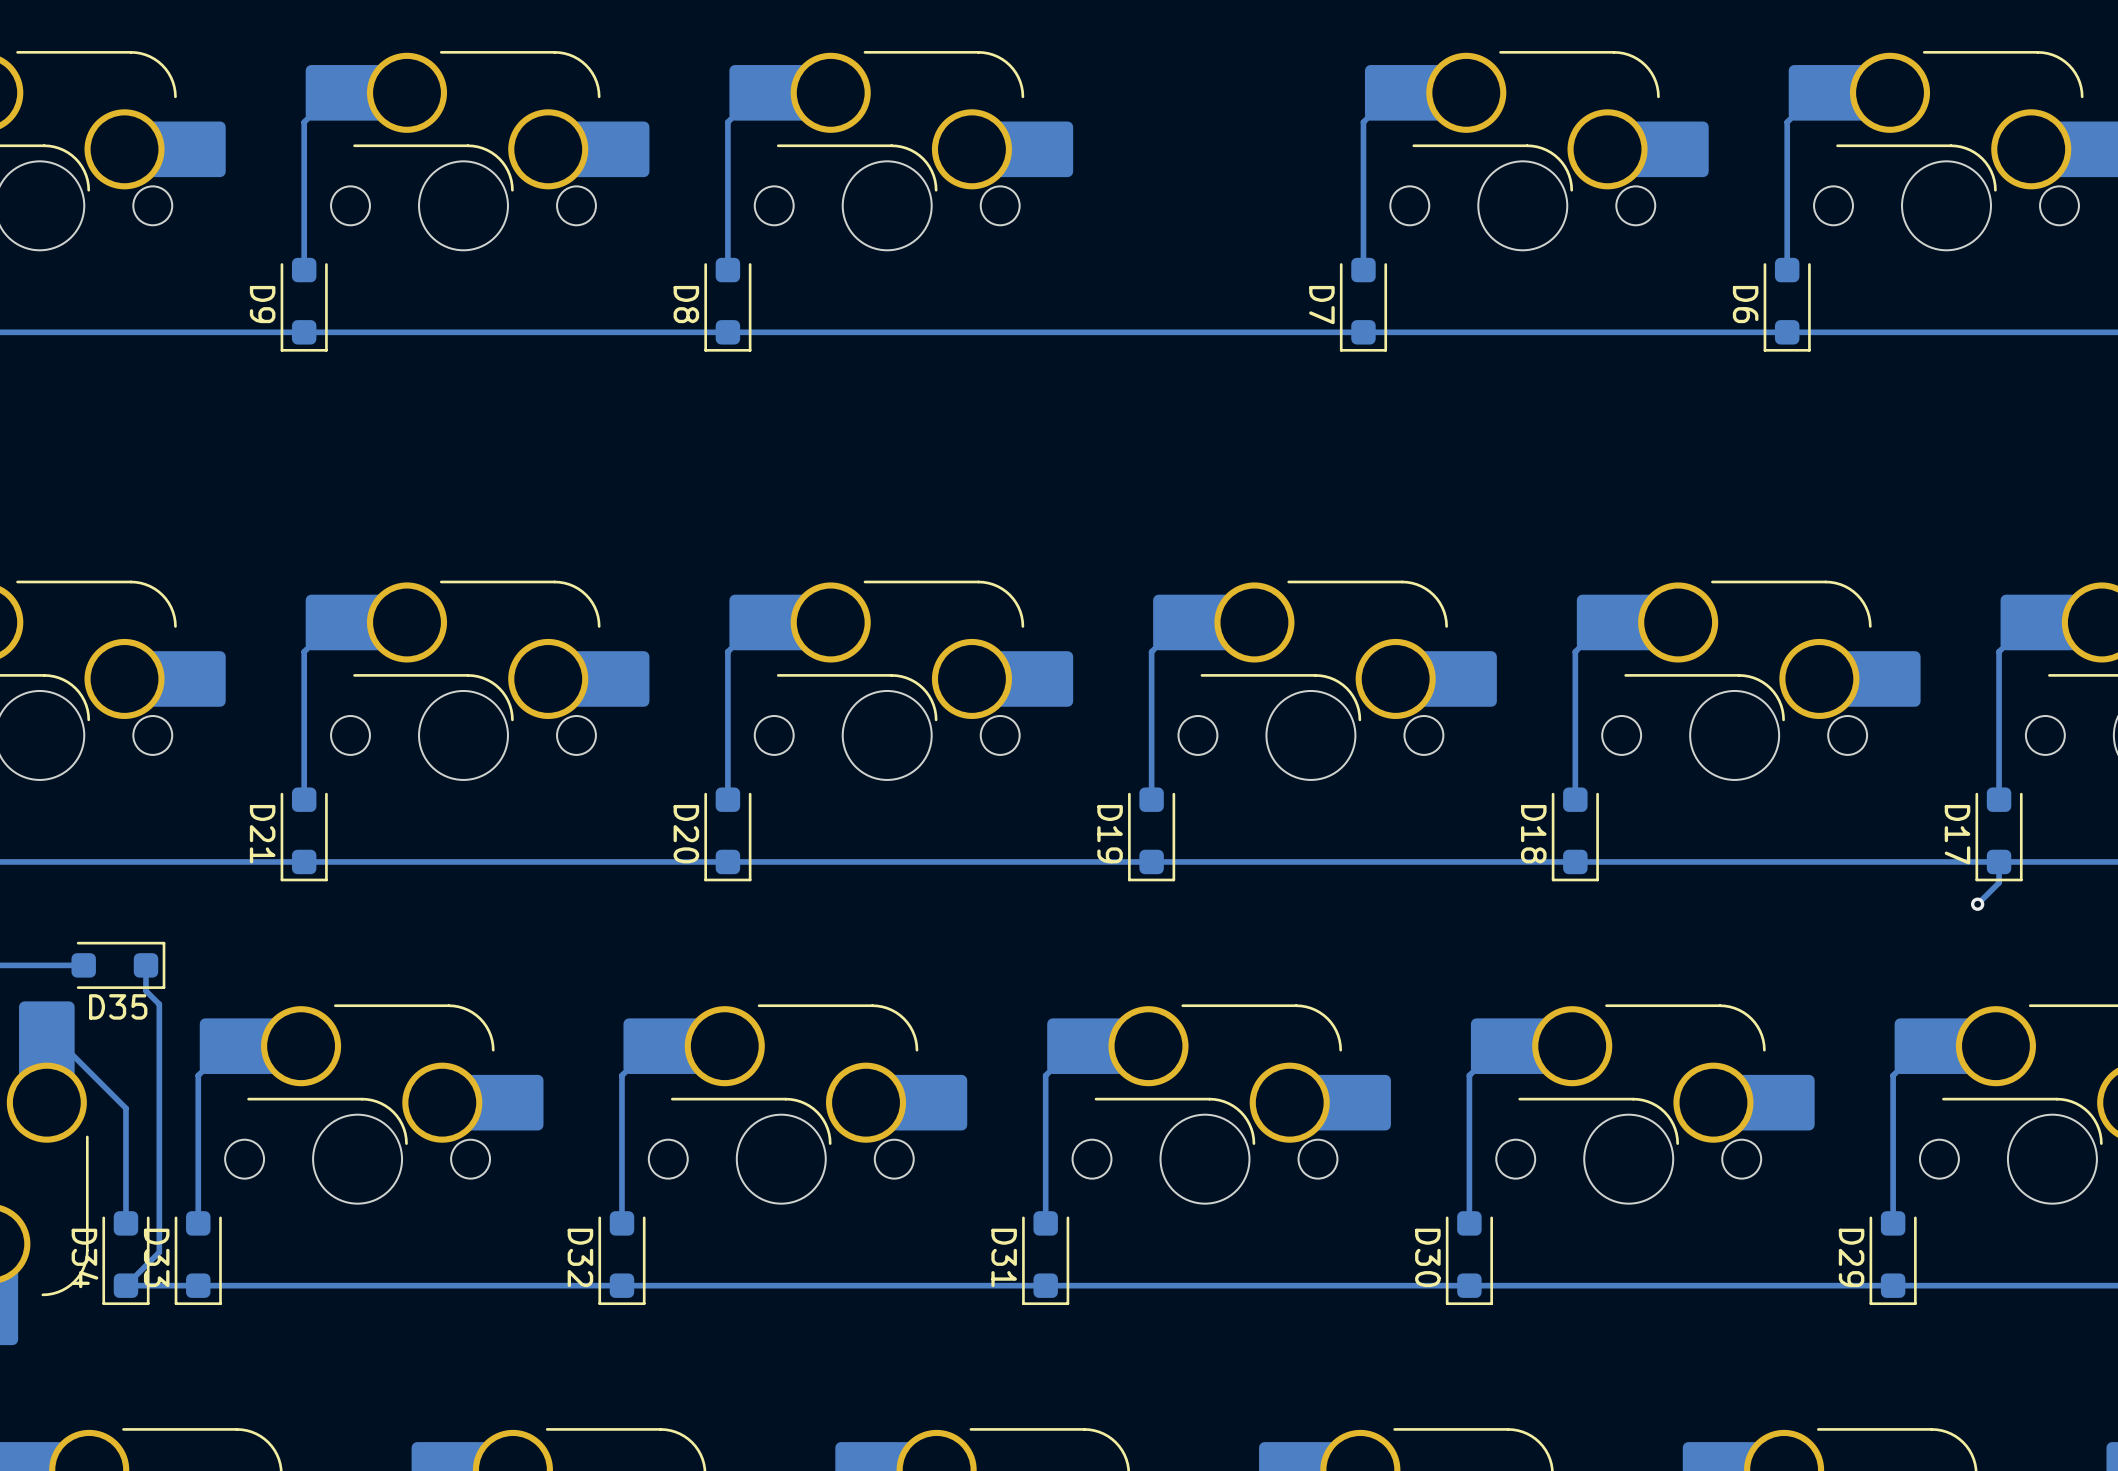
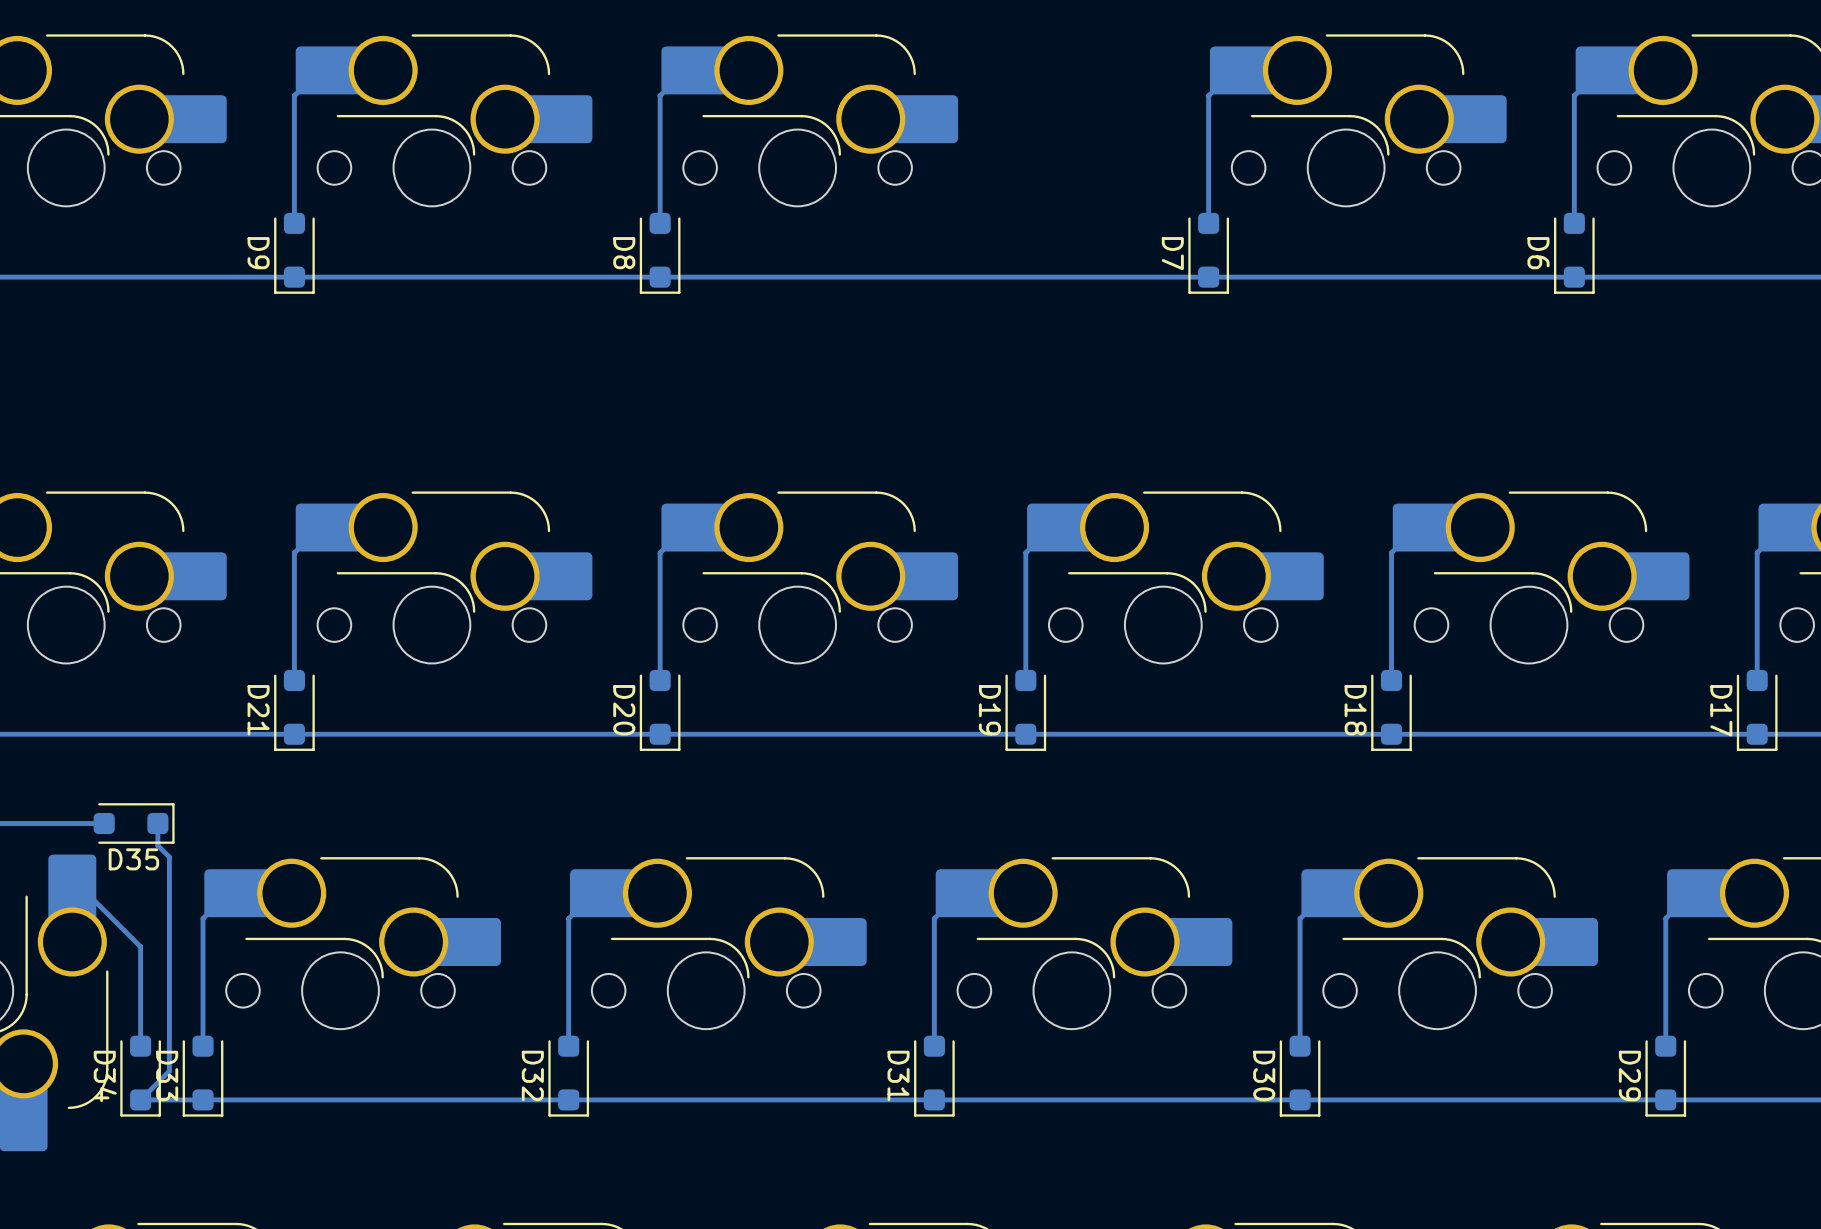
track: (1999, 861) (1999, 882) (1977, 904) -> none
via: (1977, 904) -> none

